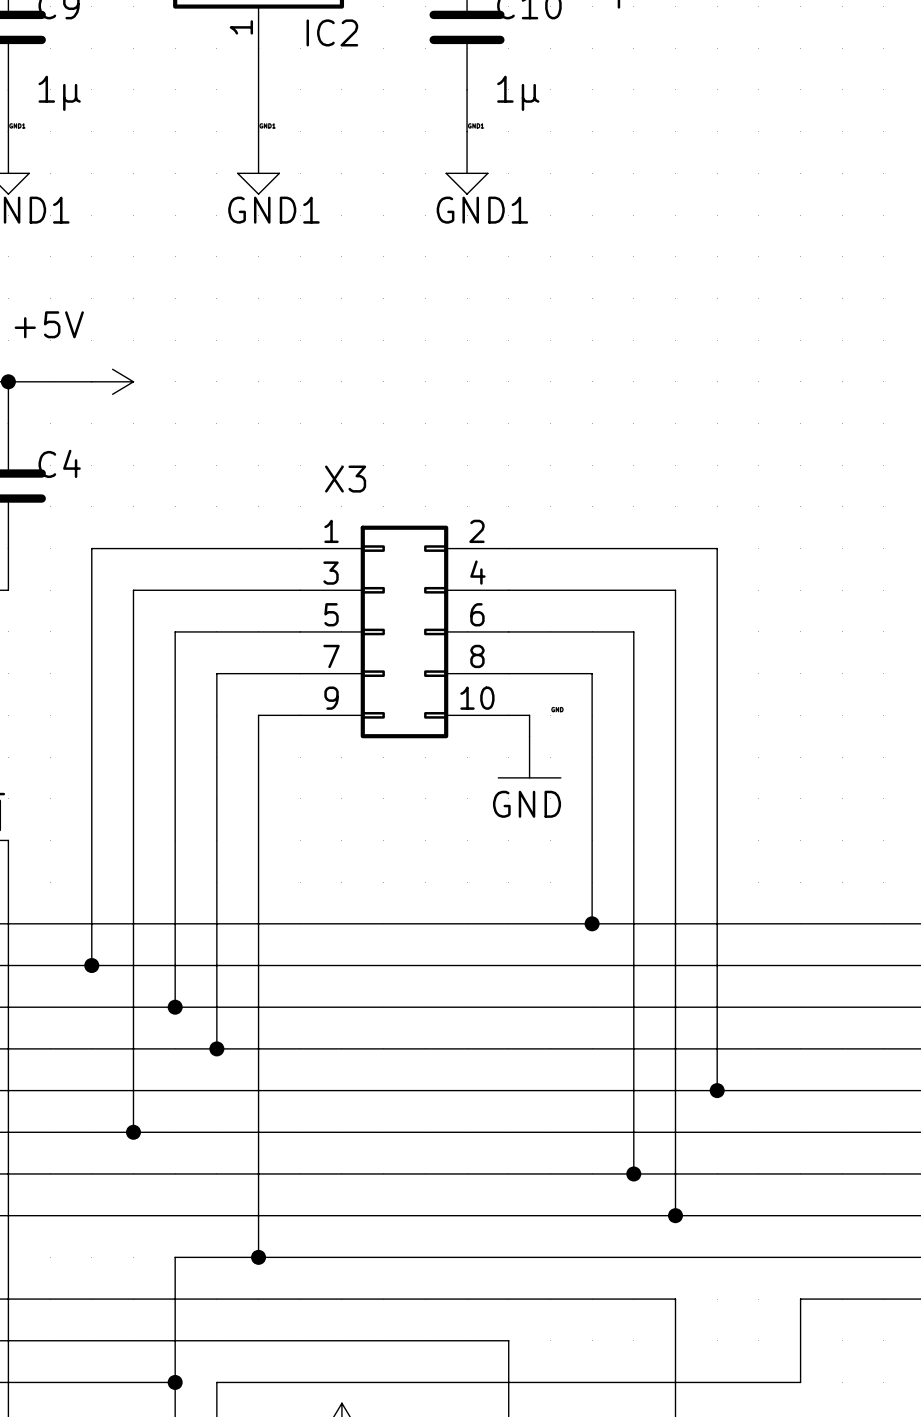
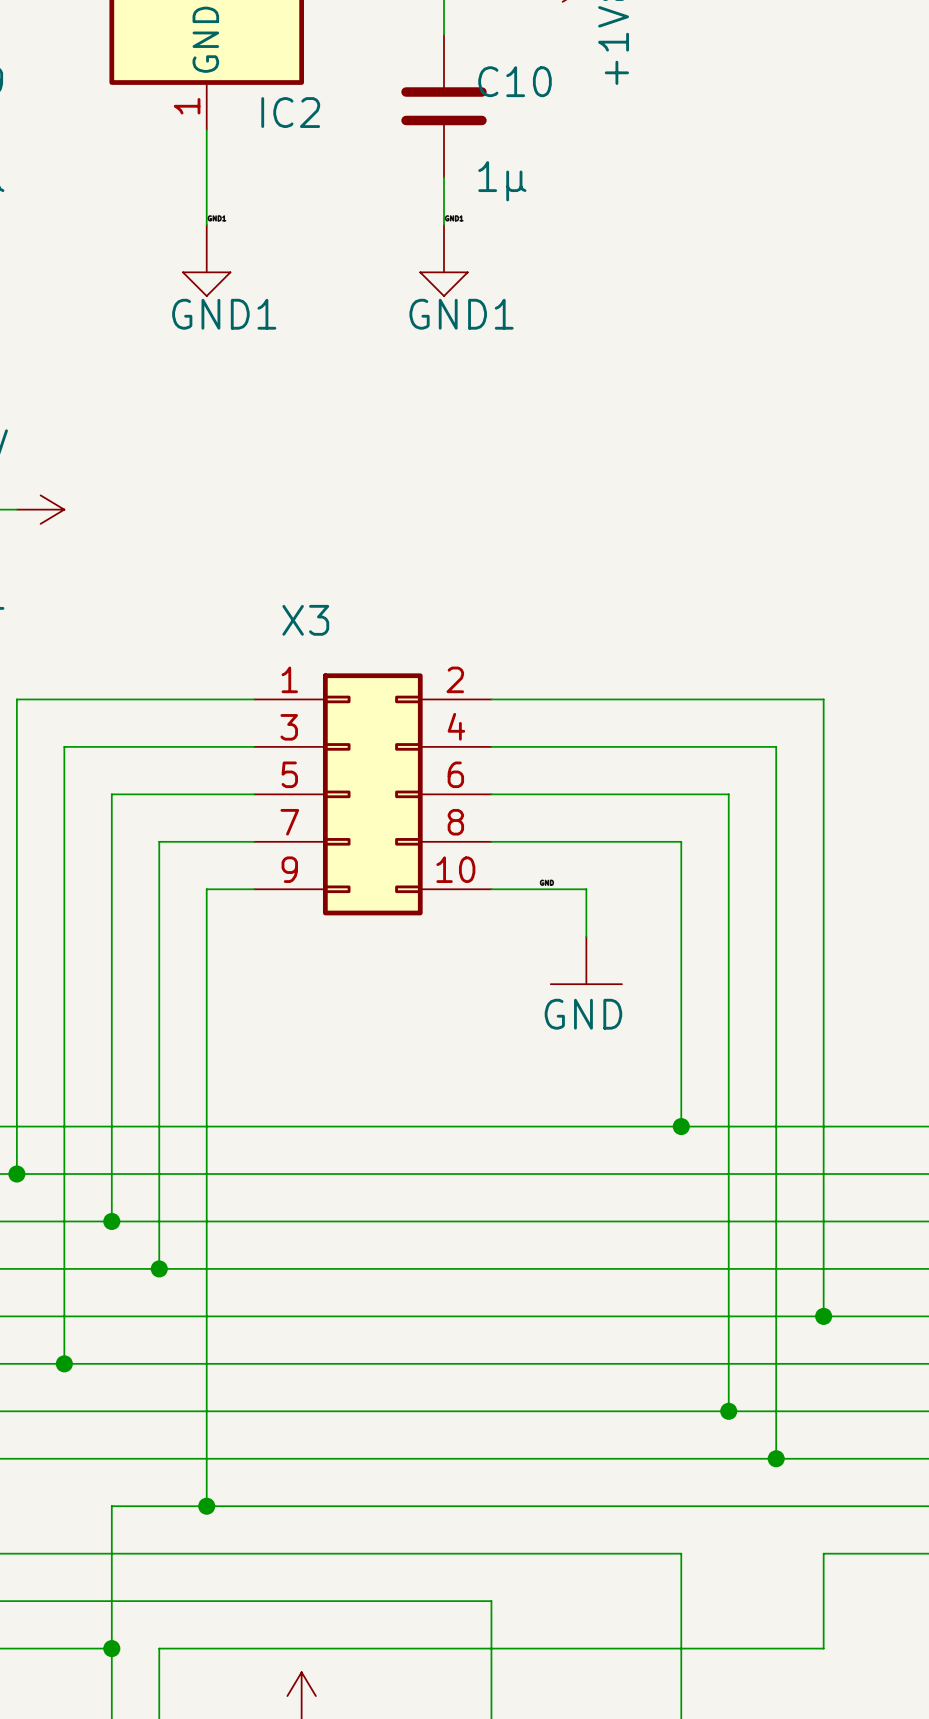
wire: (717, 548) (717, 631) -> (633, 794) (728, 794)
wire: none -> (728, 699) (823, 699) (823, 1316)
wire: (675, 590) (675, 673) -> (681, 746) (776, 746) (776, 1458)
wire: (633, 631) (633, 1173) -> none
wire: (592, 673) (592, 715) -> (586, 841) (681, 841)
wire: (529, 715) (529, 736) -> (515, 889) (586, 889)
power symbol position: GND (529, 757) -> GND (586, 960)
wire: (592, 757) (592, 923) -> none
junction position: (592, 923) -> (681, 1126)
wire: (675, 923) (675, 1215) -> none
wire: none -> (728, 1316) (728, 1411)
junction: (717, 1090) -> none
junction: none -> (823, 1316)
junction: (633, 1173) -> none
junction: none -> (728, 1411)
junction: (675, 1215) -> none
junction: none -> (776, 1458)

